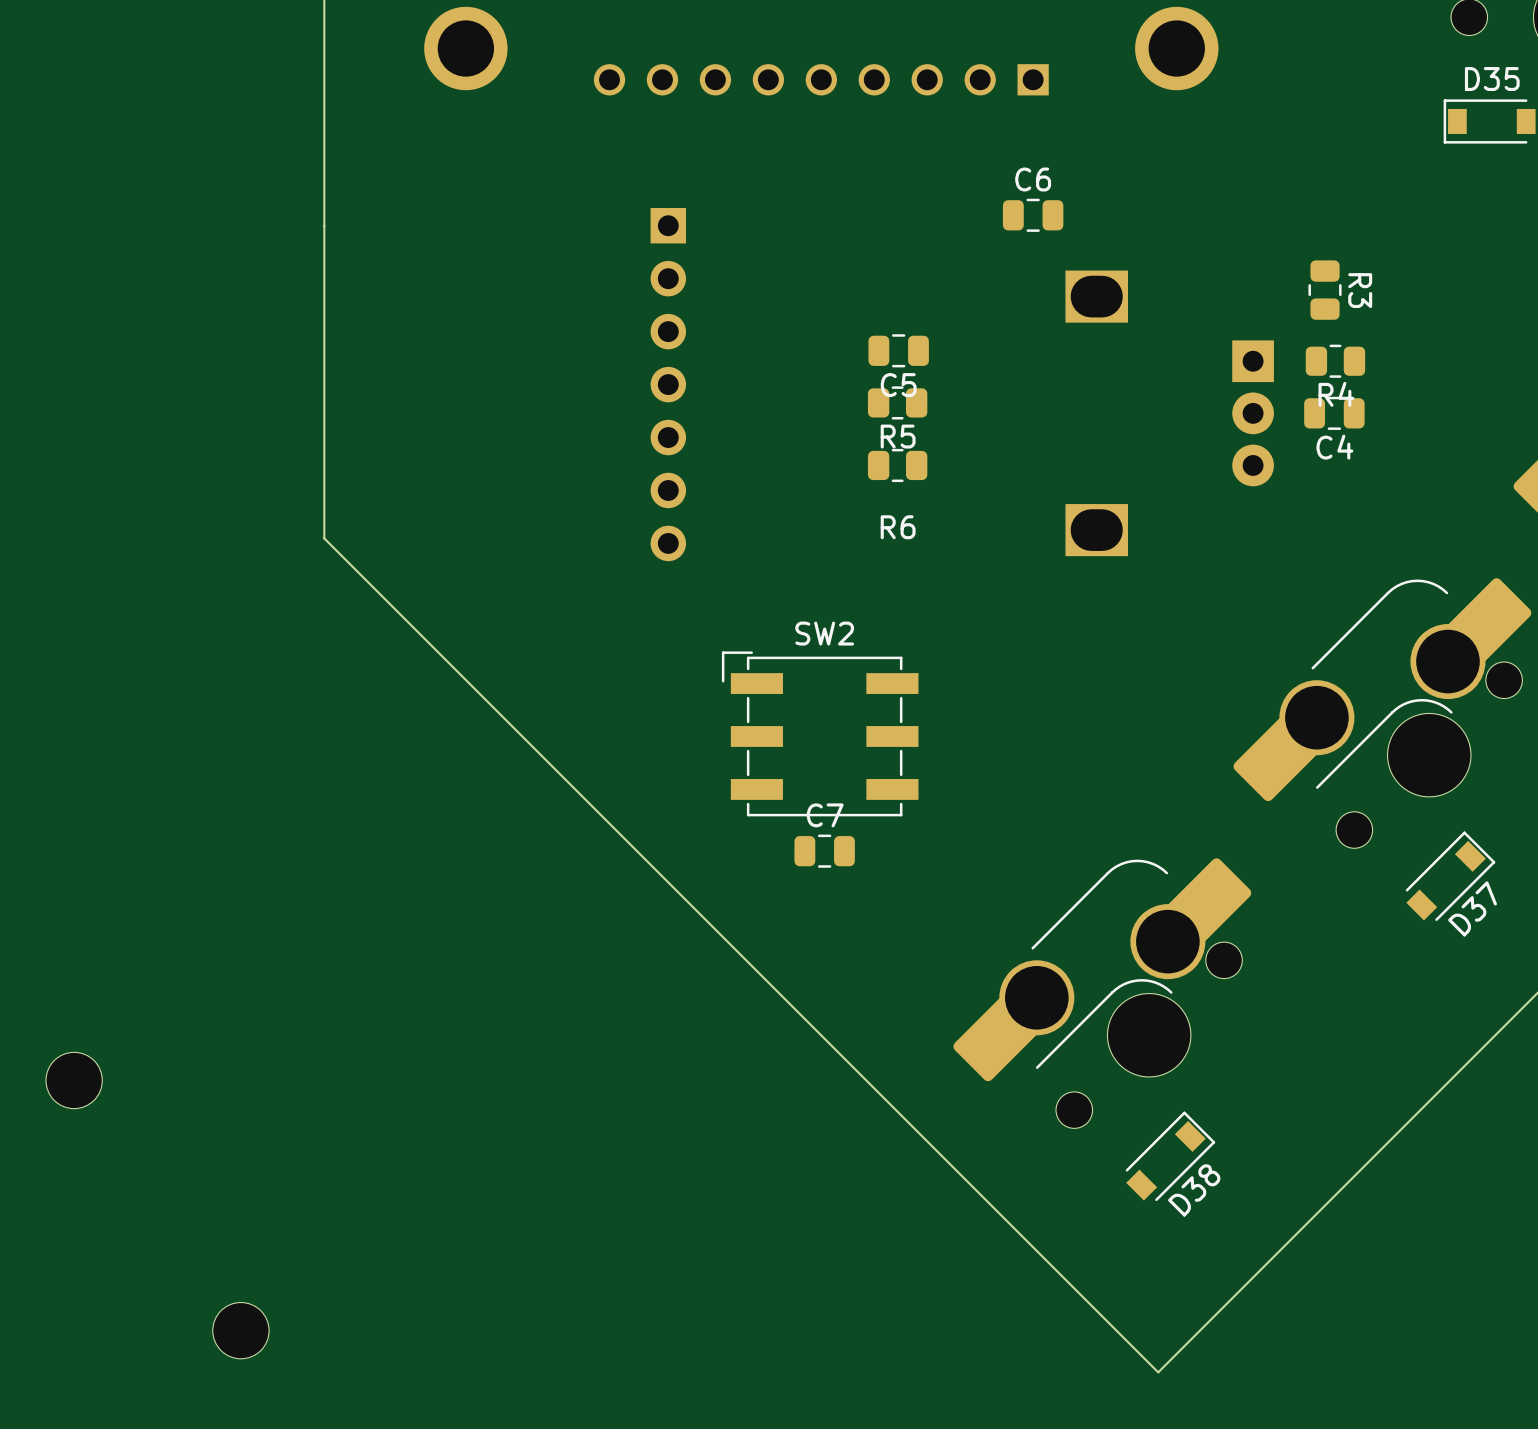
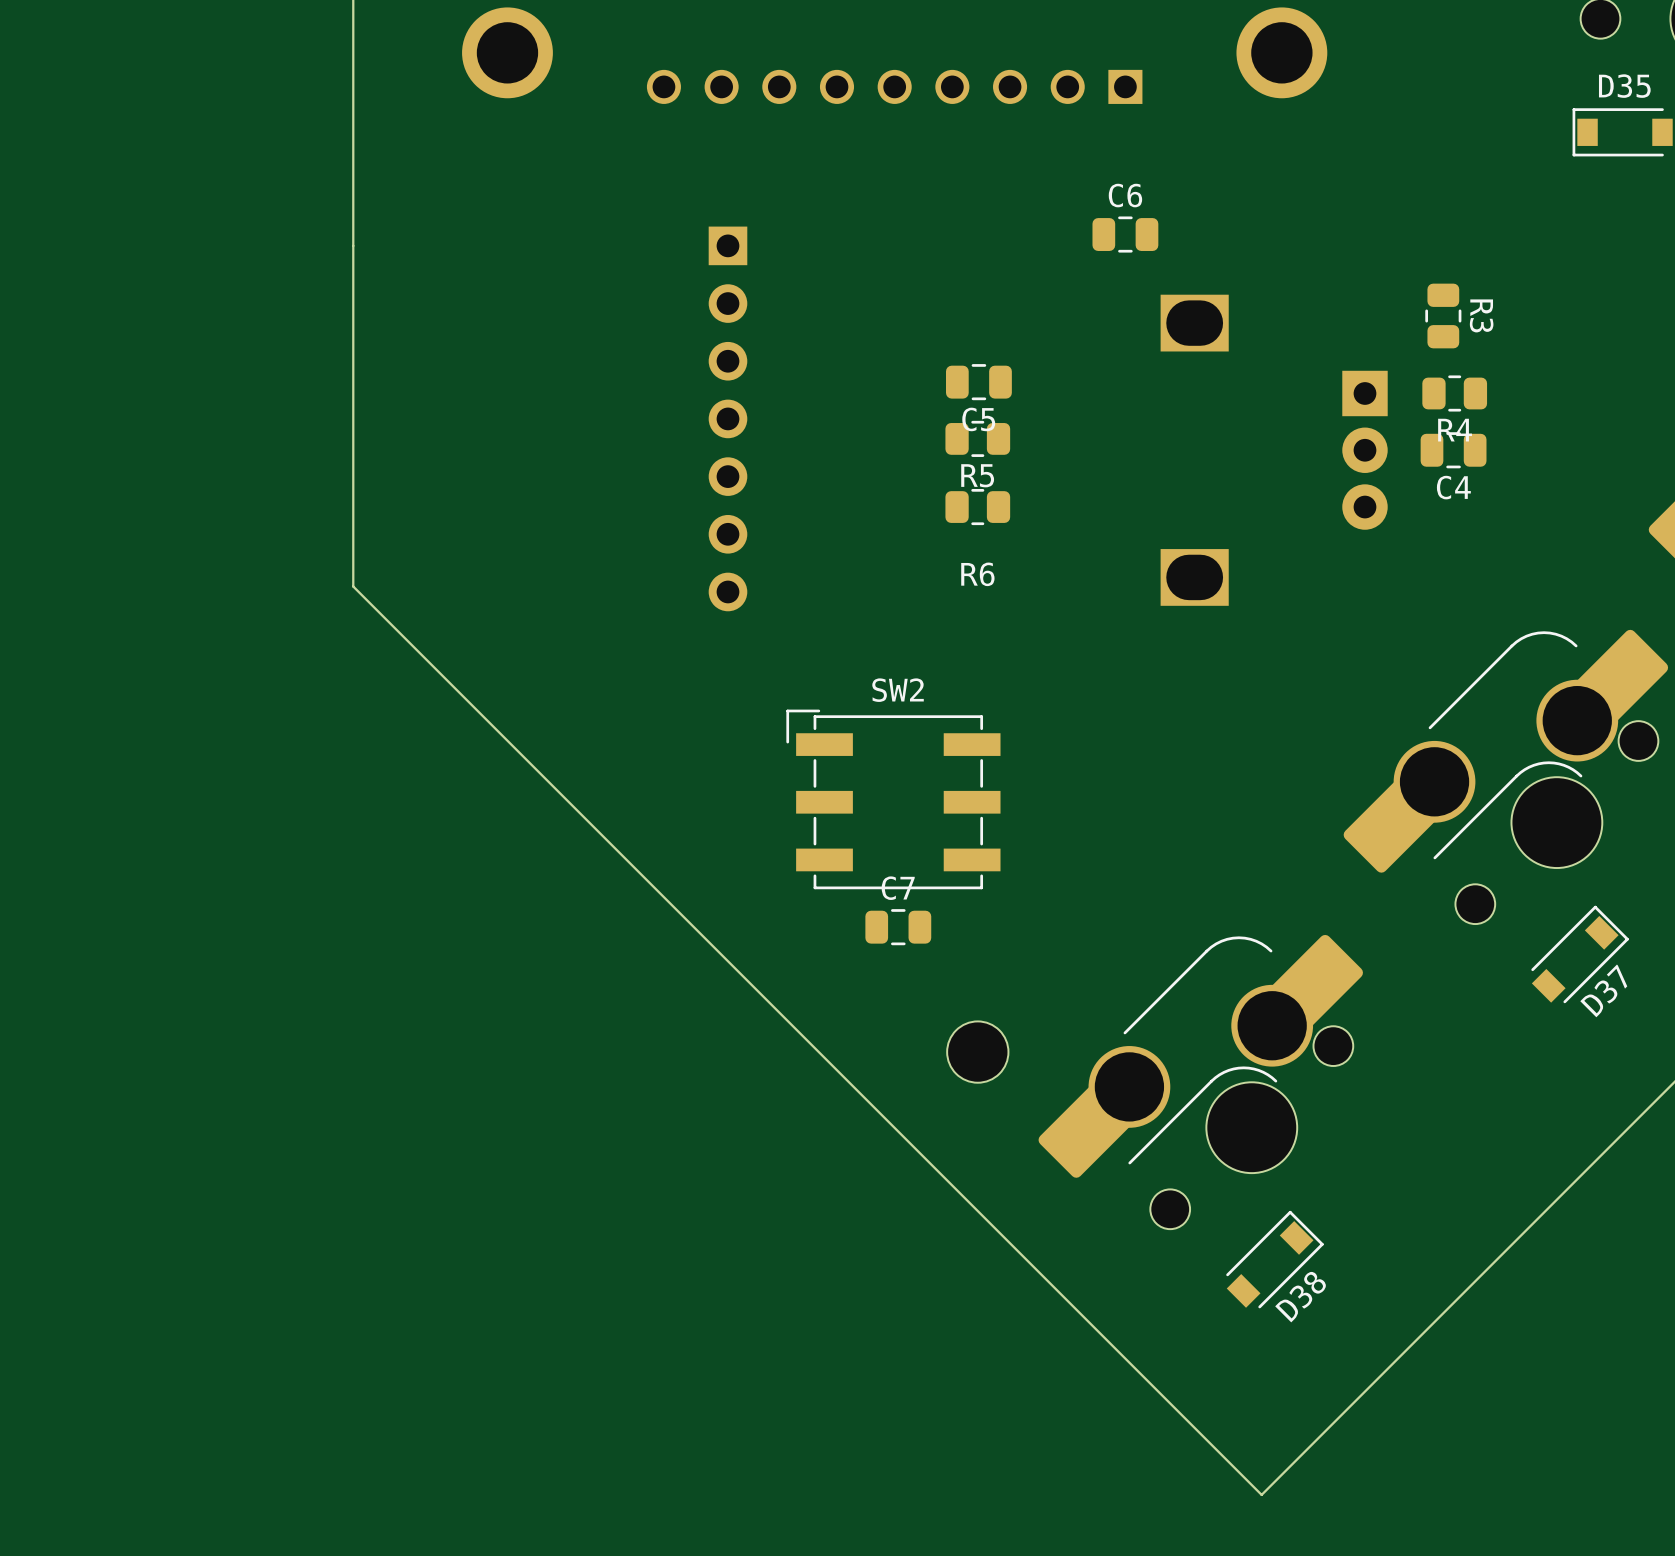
part: none -> (977, 1052)
part: (74, 1080) -> none
part: (240, 1330) -> none

